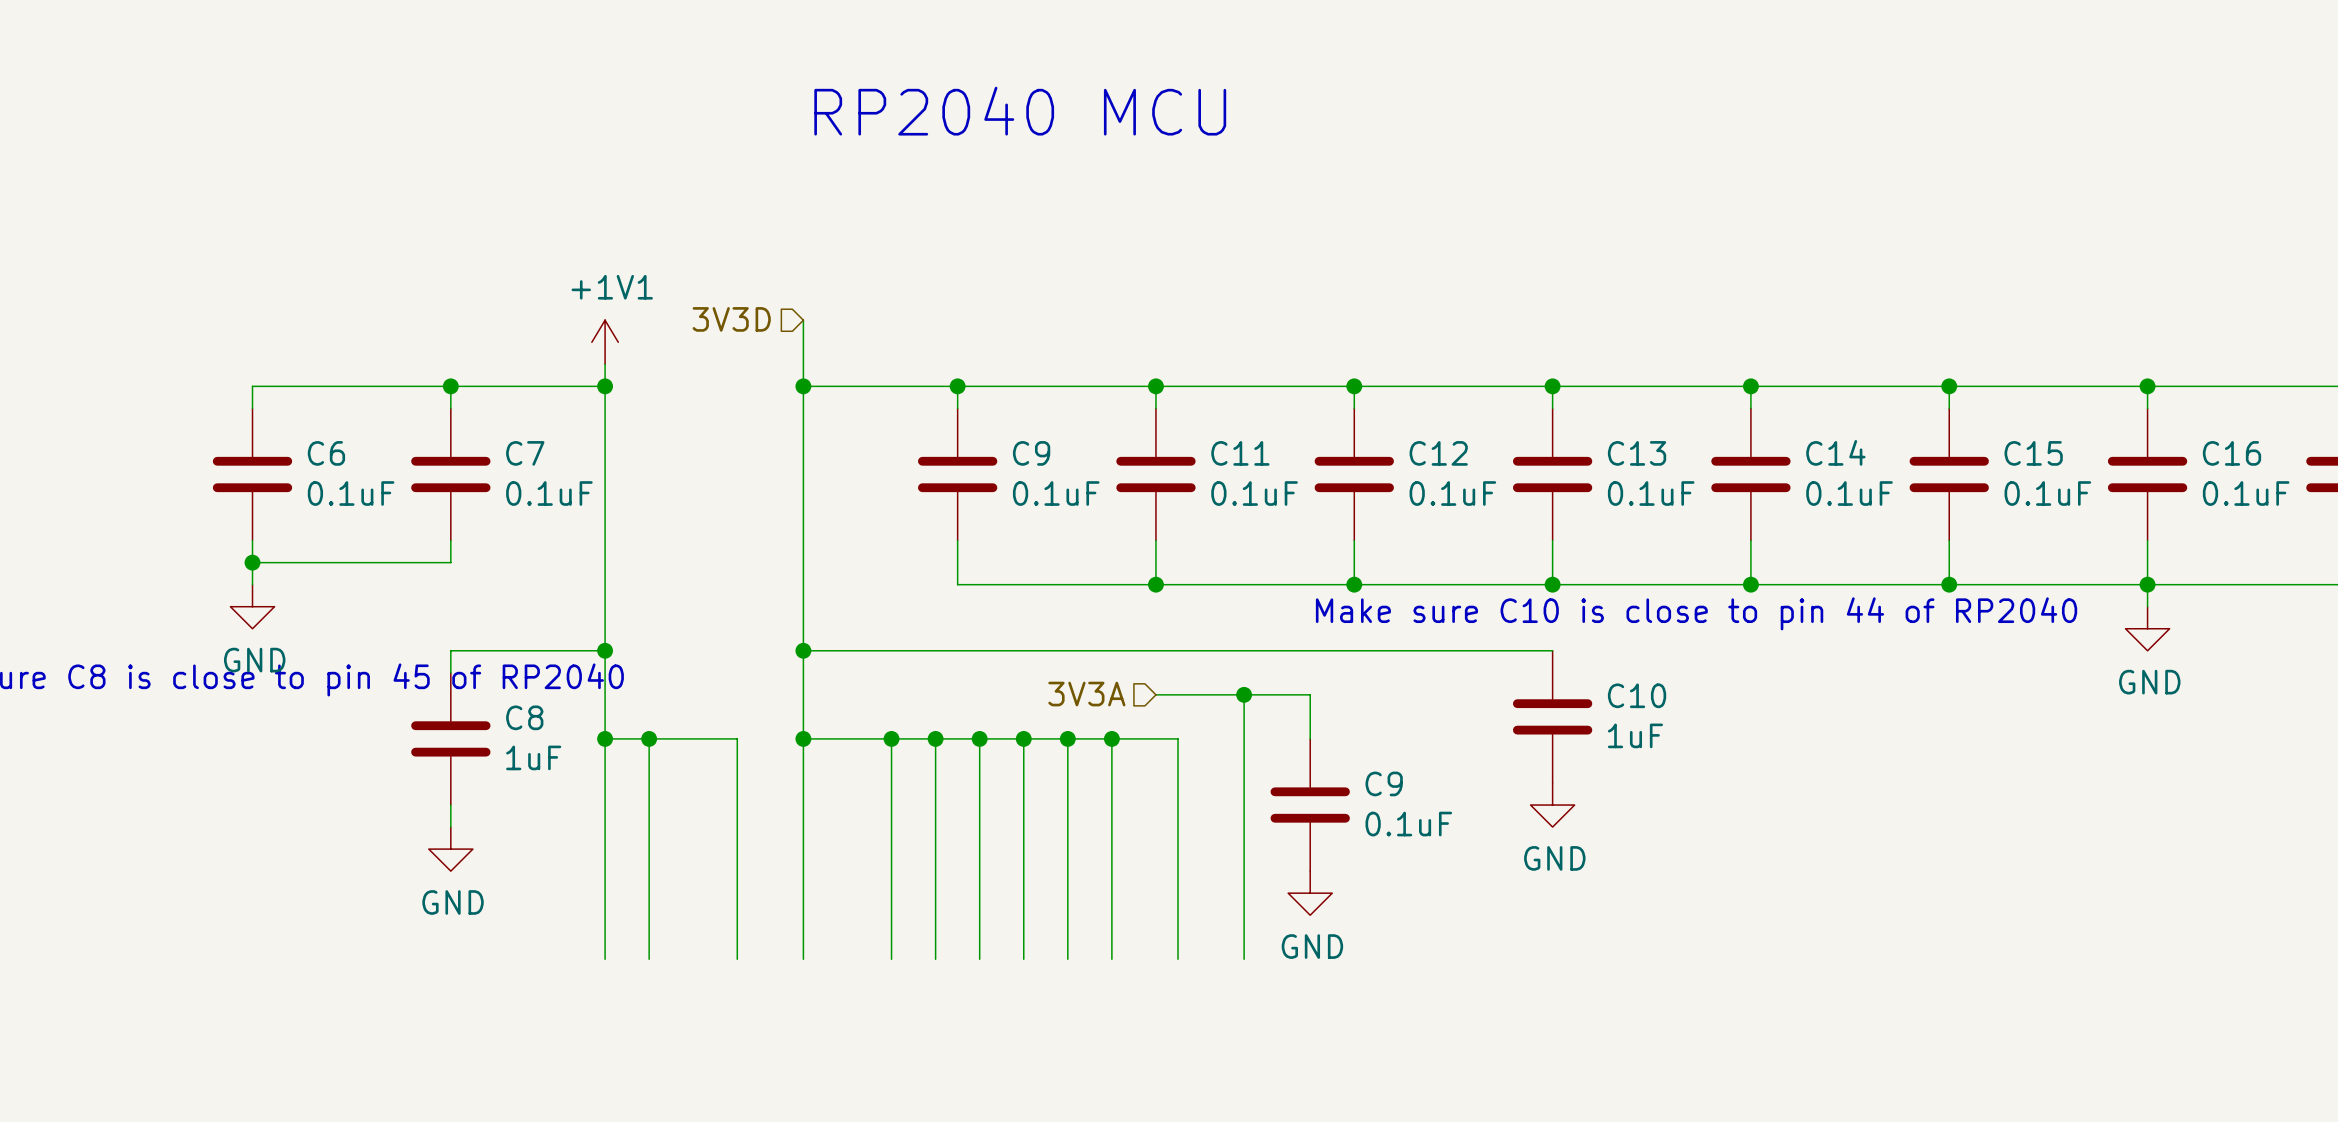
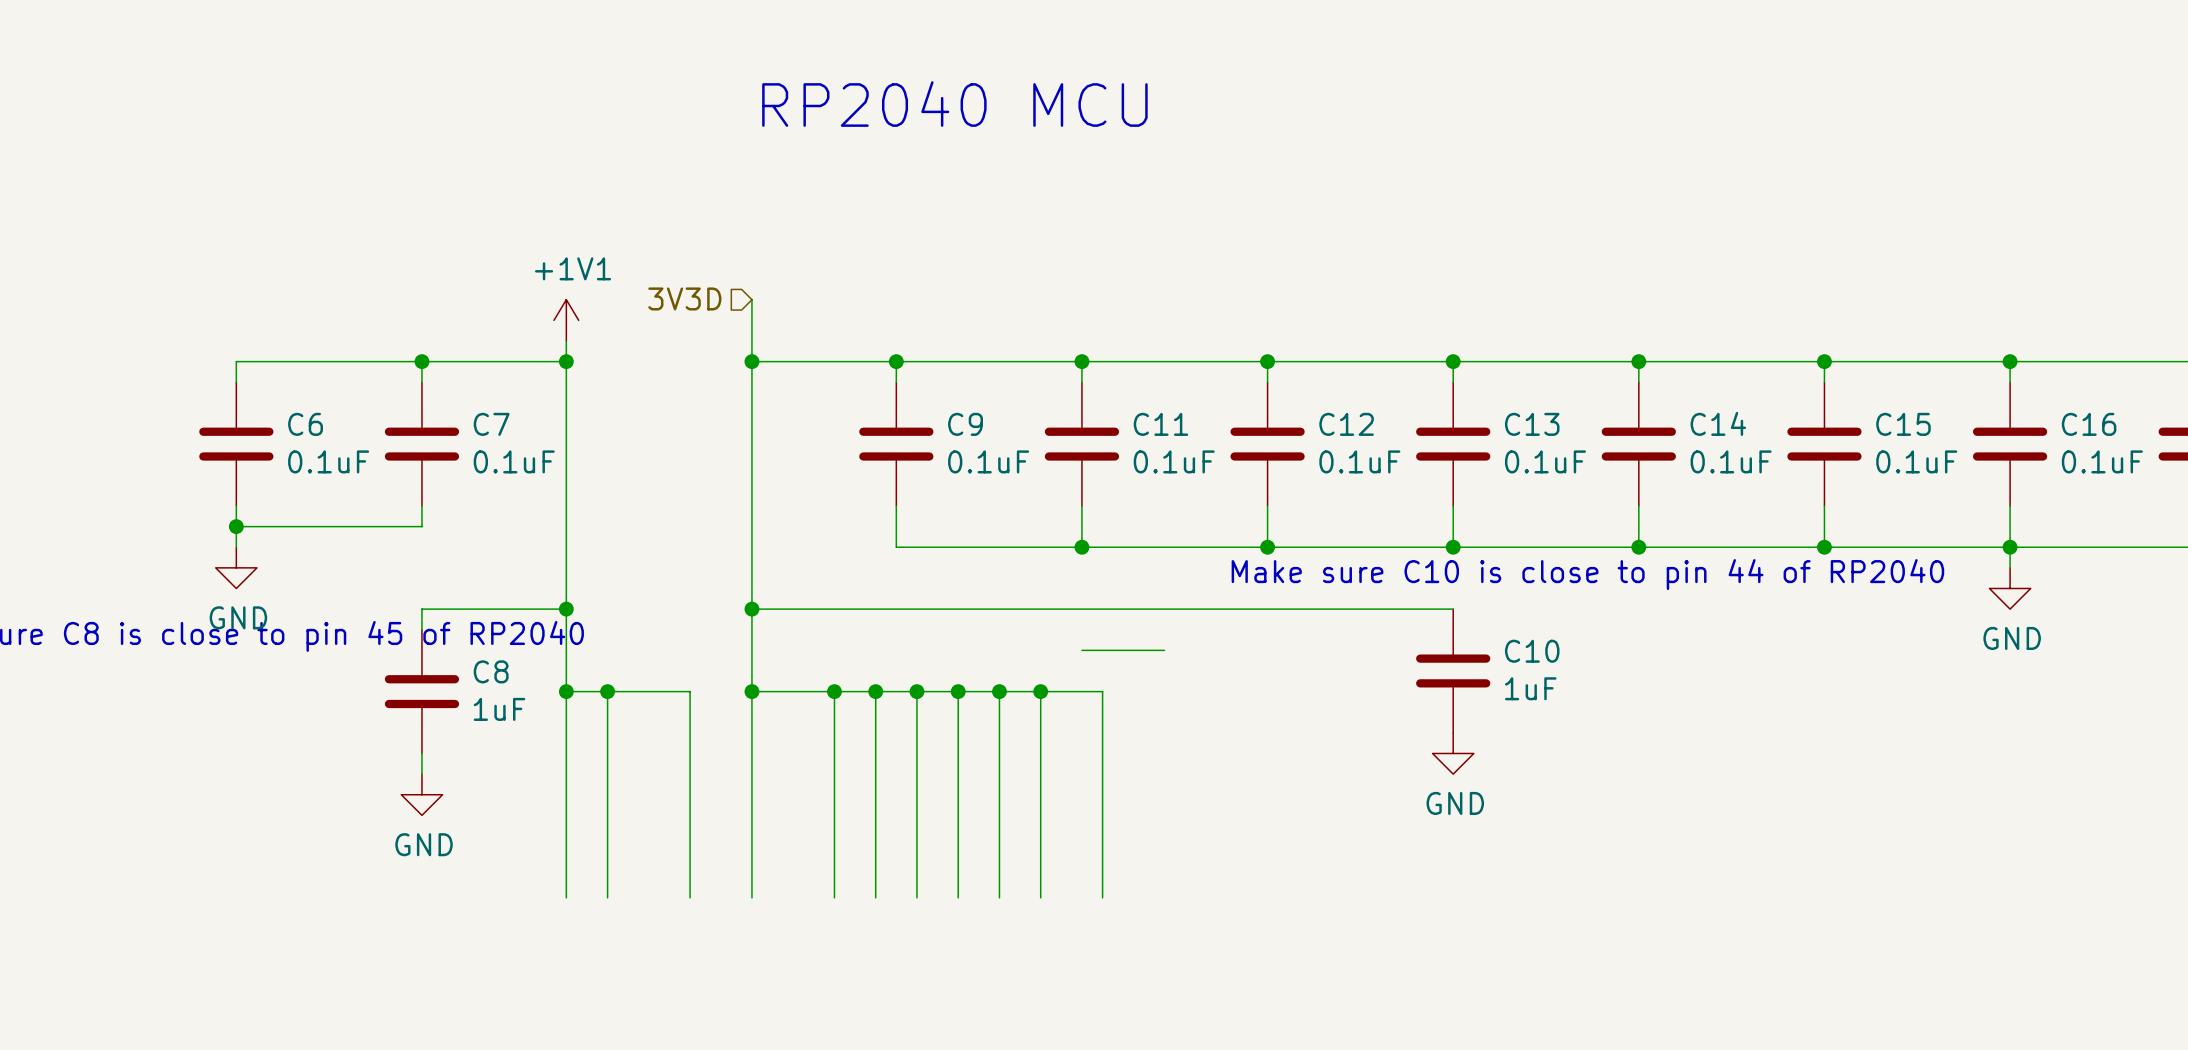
hierarchical label: 3V3A (1086, 694) -> none
junction: (1244, 694) -> none
wire: (1310, 738) (1310, 694) (1244, 694) (1244, 959) -> none
C9: 0.1uF (1310, 805) -> none
power symbol: GND (1310, 893) -> none

